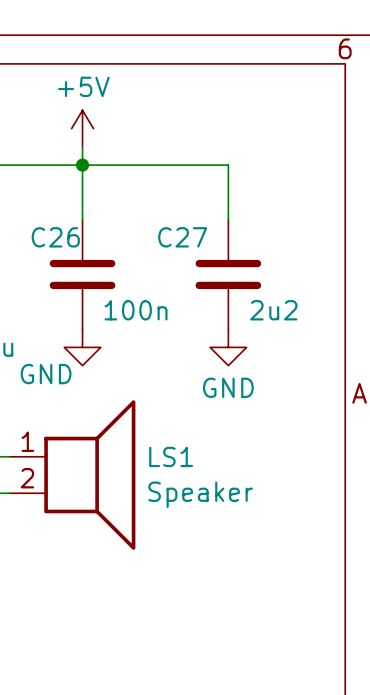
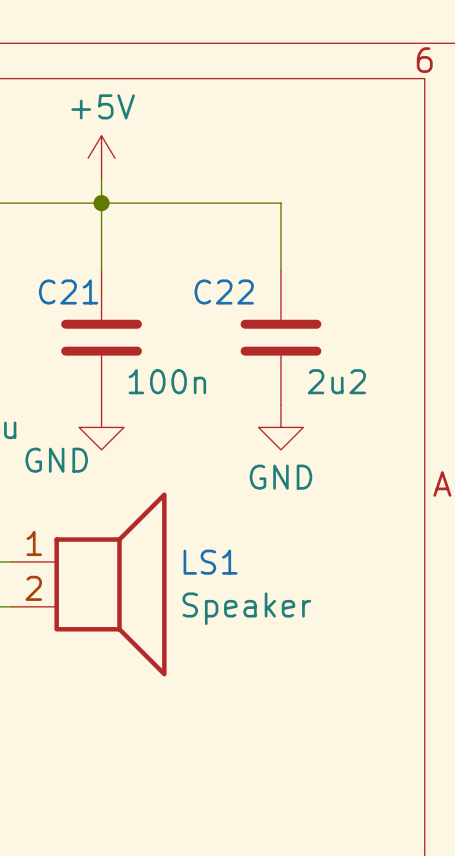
C26 name: C26 (55, 237) -> C21 (68, 292)
C27 name: C27 (182, 237) -> C22 (224, 292)

